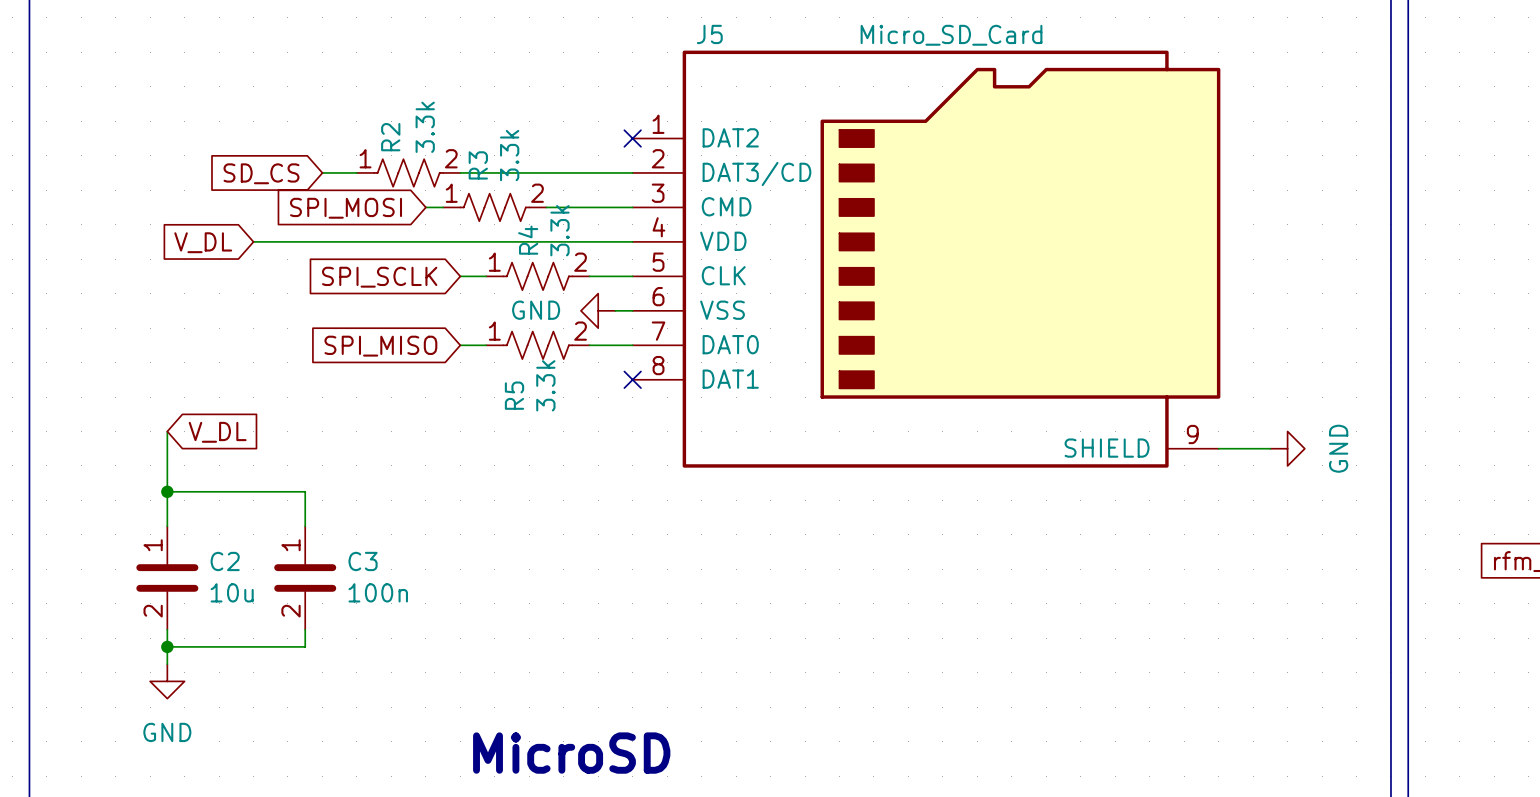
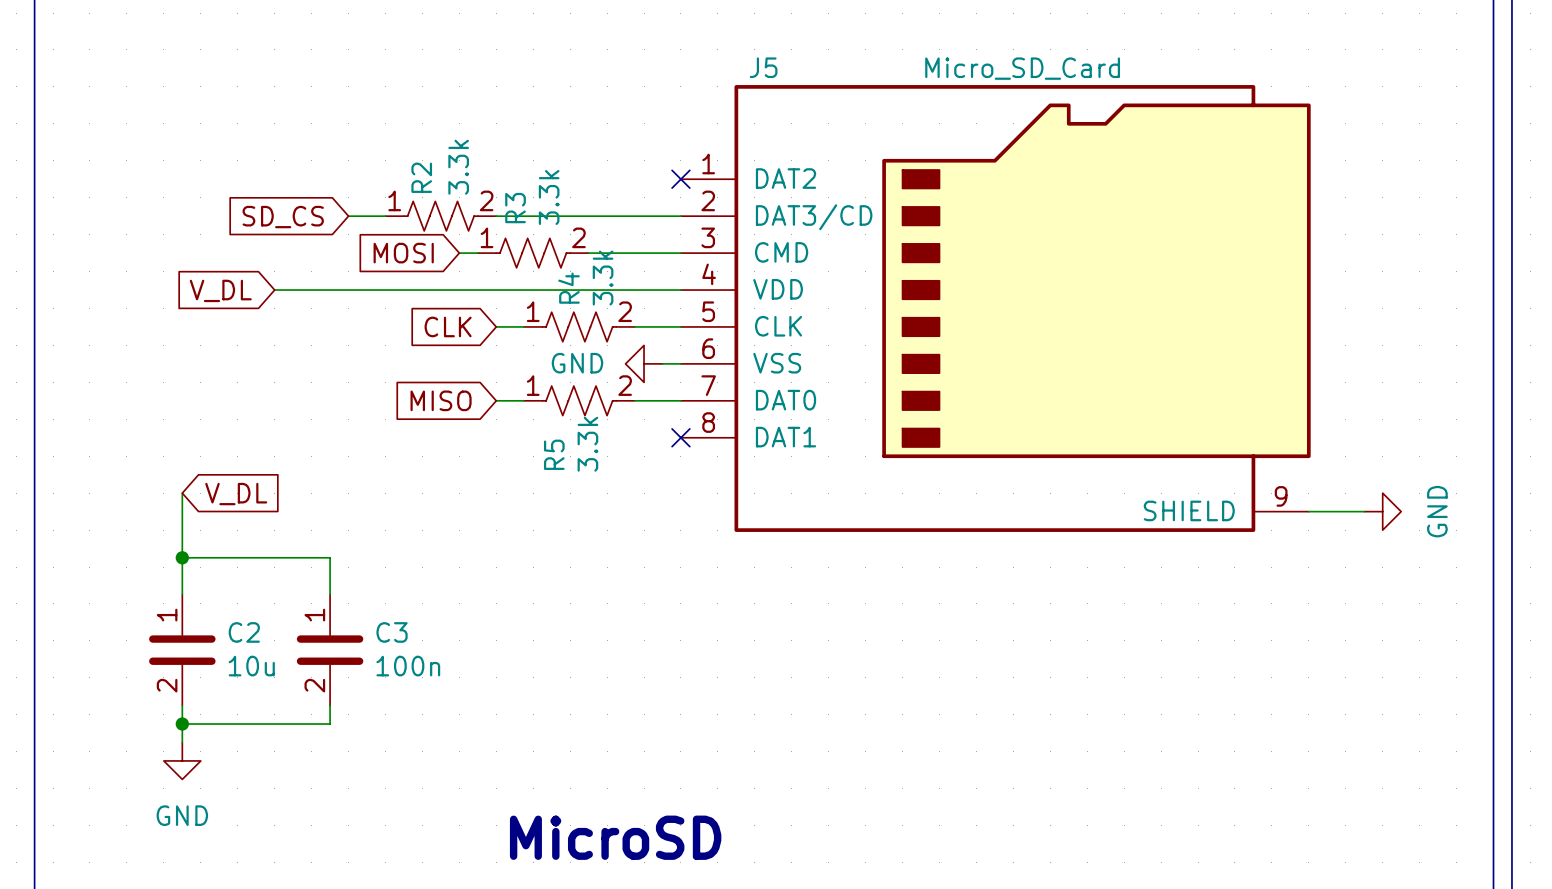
global label: SPI_MOSI (346, 208) -> MOSI (403, 253)
global label: SPI_SCLK (379, 277) -> CLK (448, 326)
global label: SPI_MISO (380, 346) -> MISO (441, 400)

